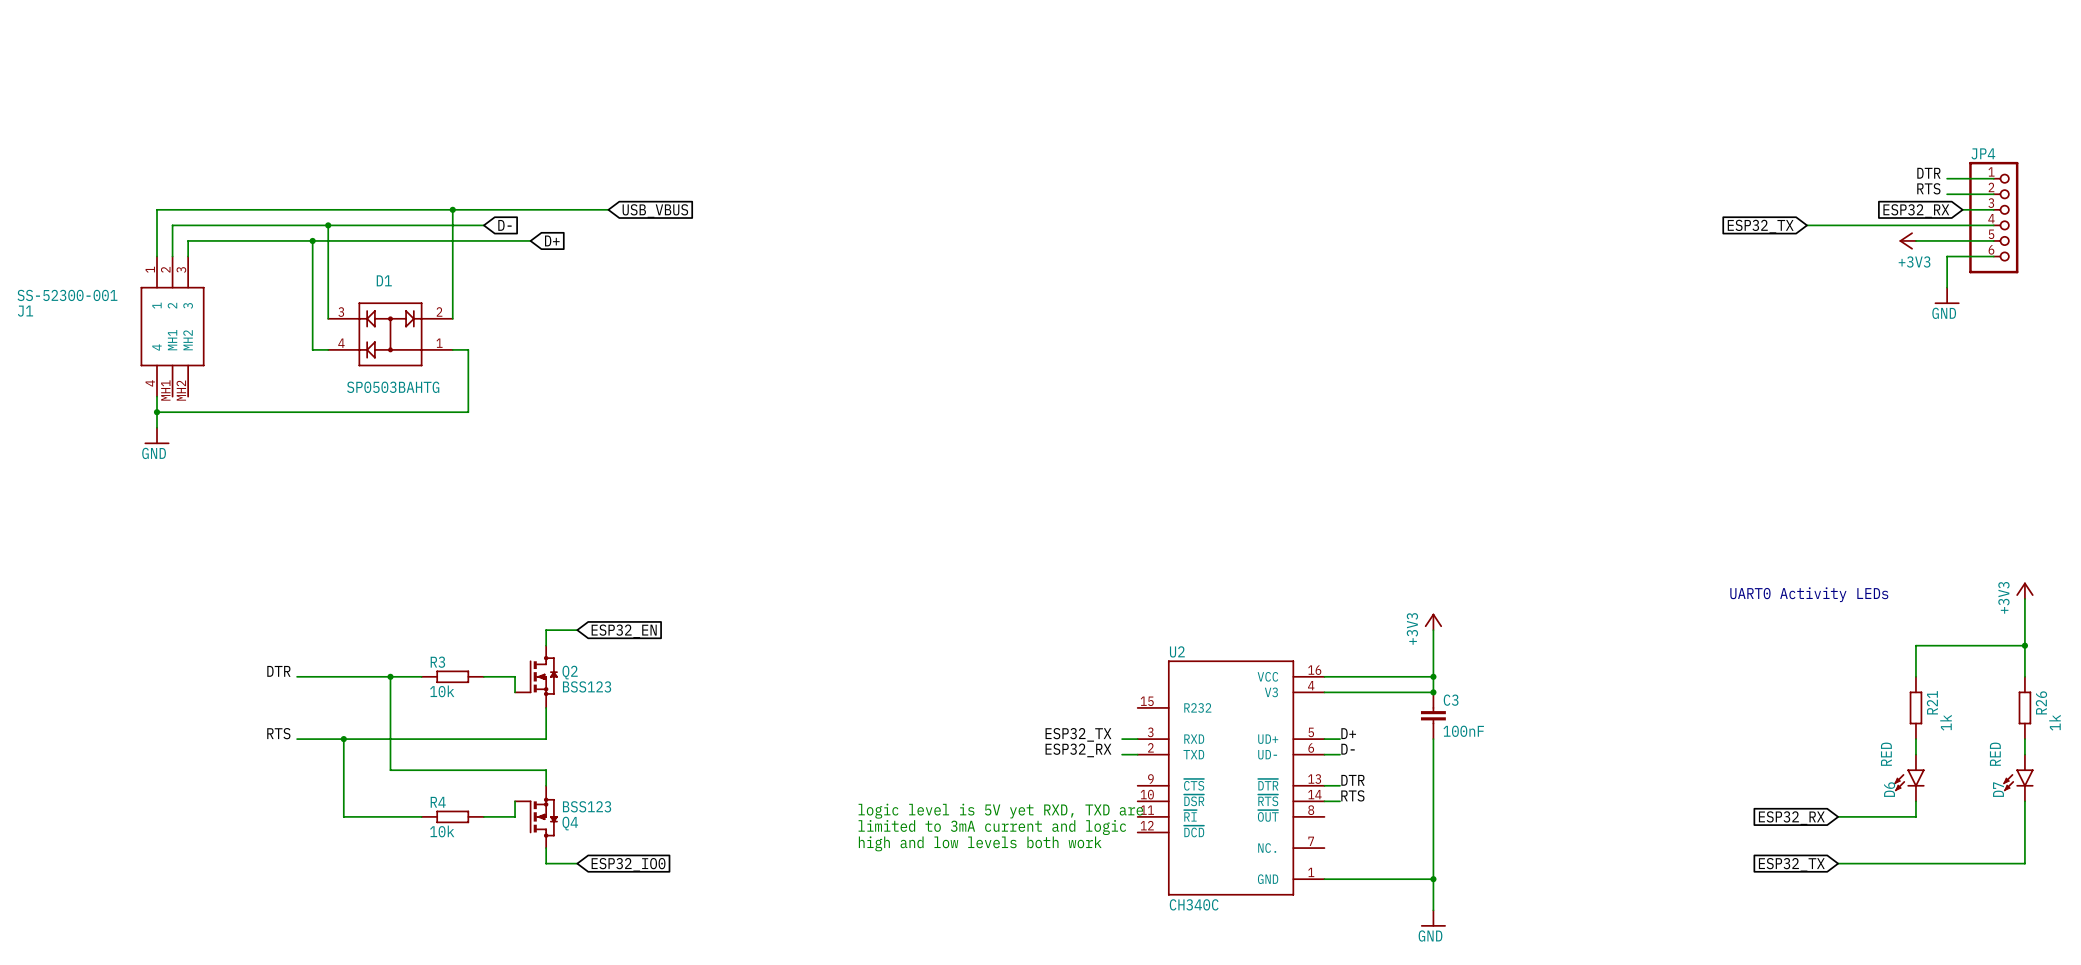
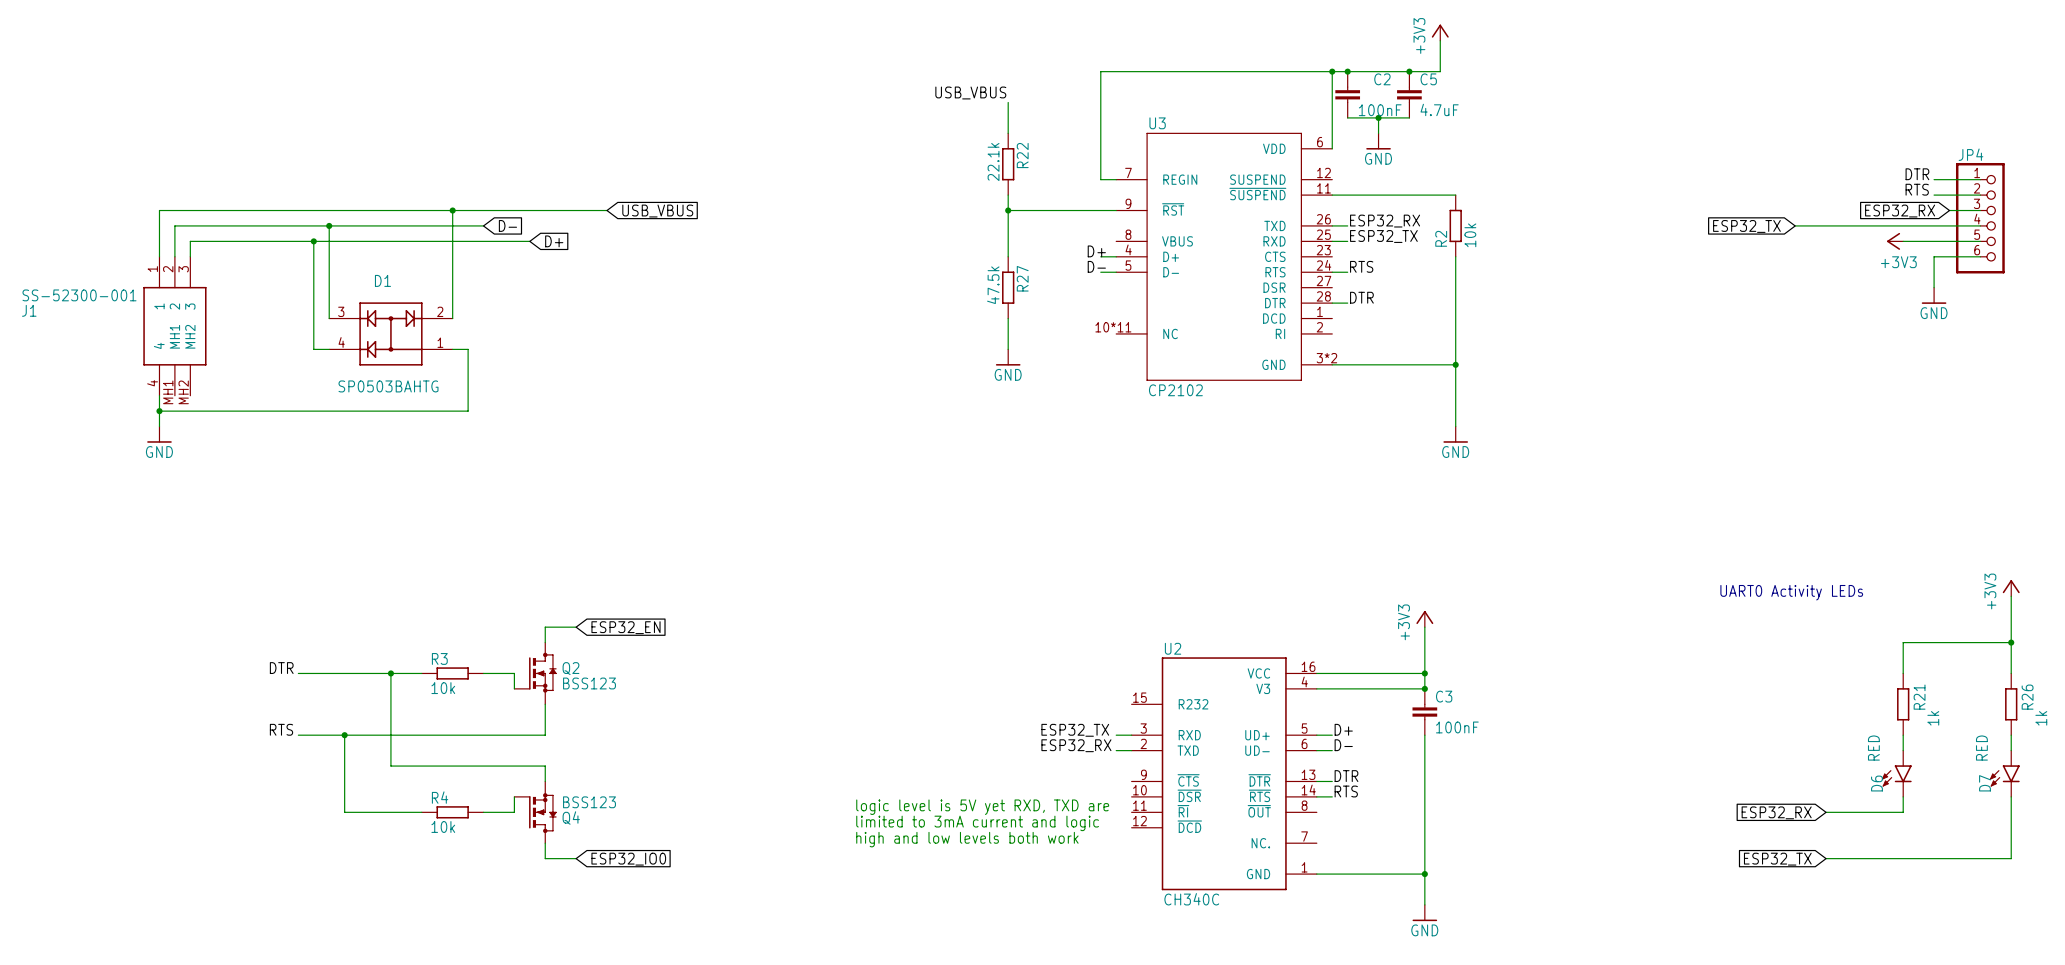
power symbol: none -> +3V3 (1440, 32)
wire: none -> (1440, 40) (1440, 71) (1100, 71) (1100, 179) (1116, 179)
wire: none -> (1332, 71) (1332, 148)
junction: none -> (1332, 71)
junction: none -> (1347, 71)
junction: none -> (1409, 71)
label: none -> USB_VBUS (970, 92)
C2: none -> 100nF (1347, 94)
C5: none -> 4.7uF (1409, 94)
wire: none -> (1008, 102) (1008, 133)
wire: none -> (1347, 117) (1409, 117)
wire: none -> (1378, 117) (1378, 133)
junction: none -> (1378, 117)
power symbol: none -> GND (1378, 141)
R22: none -> 22.1k (1008, 164)
wire: none -> (1008, 195) (1008, 256)
wire: none -> (1332, 195) (1455, 195)
wire: none -> (1008, 210) (1116, 210)
junction: none -> (1008, 210)
label: none -> ESP32_RX (1385, 221)
wire: none -> (1332, 225) (1347, 225)
R2: none -> 10k (1455, 225)
label: none -> ESP32_TX (1383, 236)
wire: none -> (1332, 241) (1347, 241)
label: none -> D+ (1096, 251)
wire: none -> (1100, 256) (1116, 256)
U3: none -> CP2102 (1224, 256)
wire: none -> (1455, 256) (1455, 426)
label: none -> D- (1096, 266)
label: none -> RTS (1361, 266)
wire: none -> (1100, 272) (1116, 272)
wire: none -> (1332, 272) (1347, 272)
R27: none -> 47.5k (1008, 287)
label: none -> DTR (1361, 297)
wire: none -> (1332, 303) (1347, 303)
wire: none -> (1008, 318) (1008, 349)
power symbol: none -> GND (1008, 357)
wire: none -> (1332, 364) (1455, 364)
junction: none -> (1455, 364)
power symbol: none -> GND (1455, 434)

